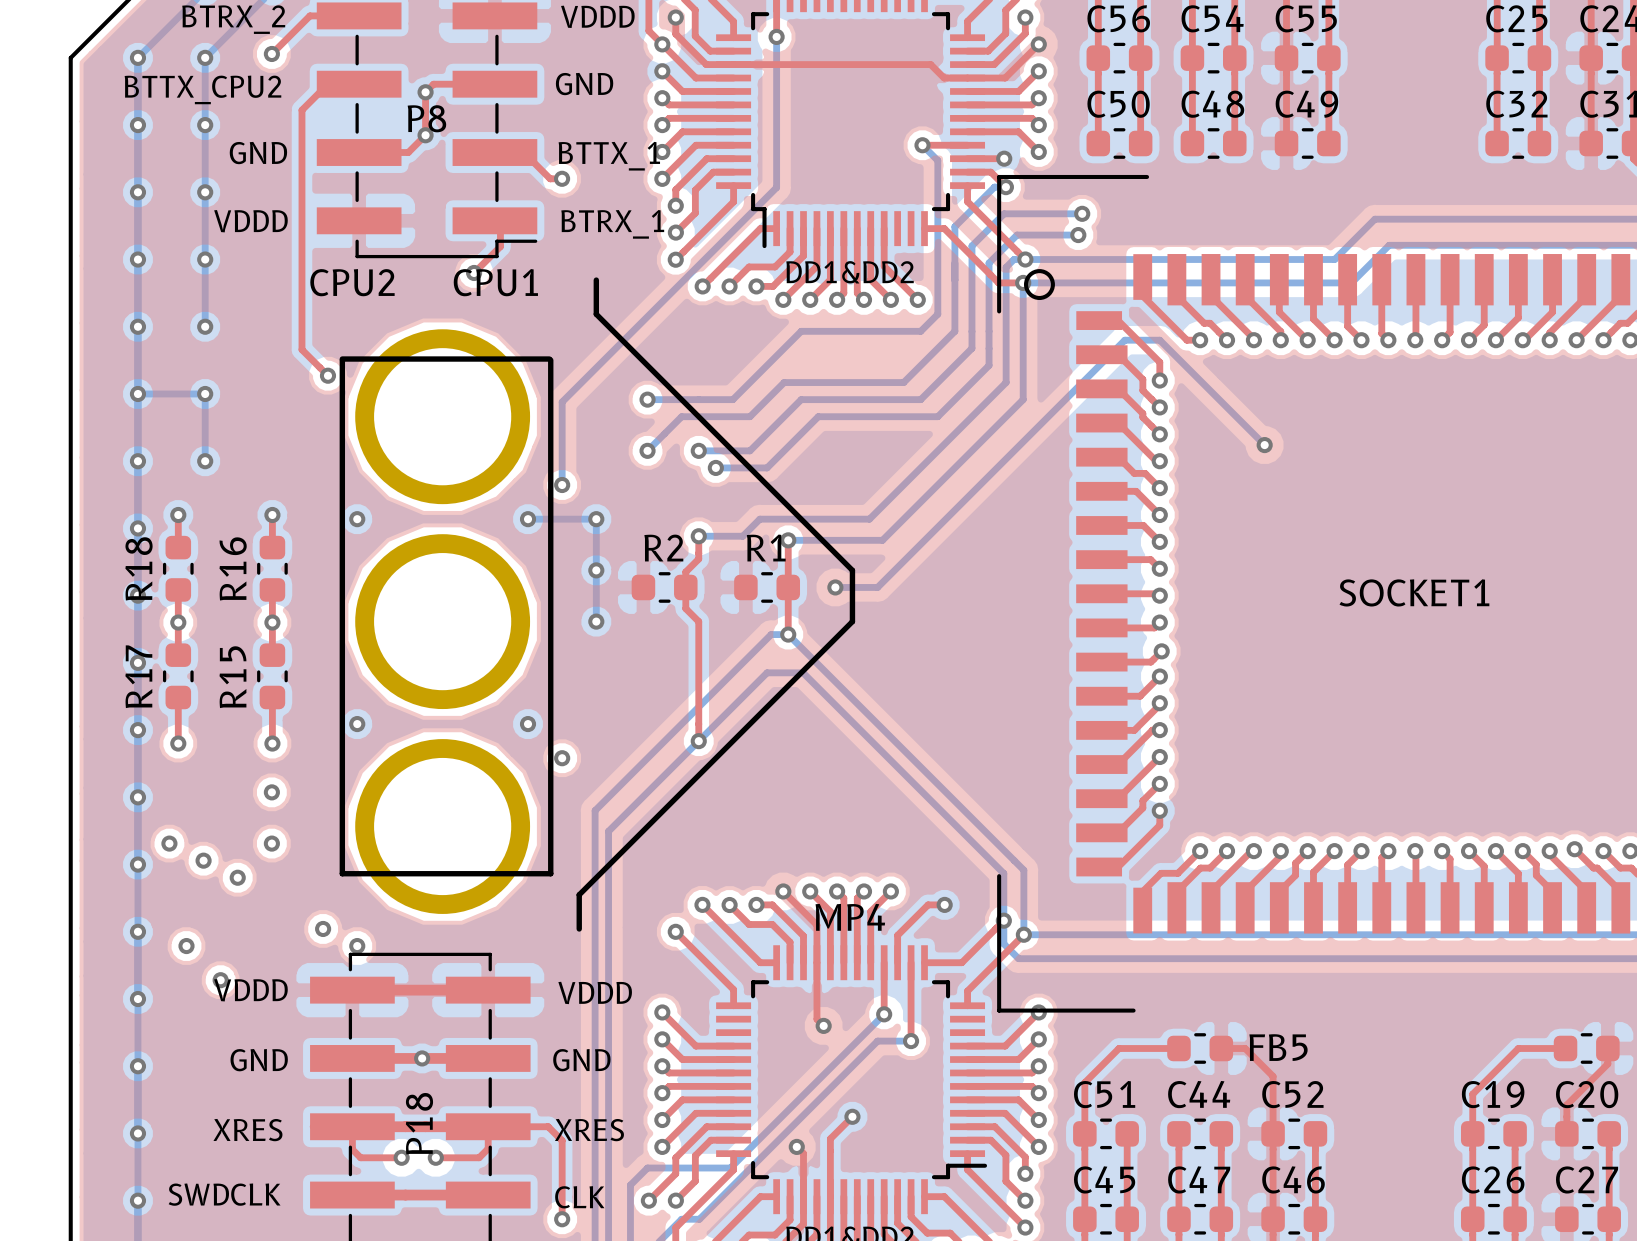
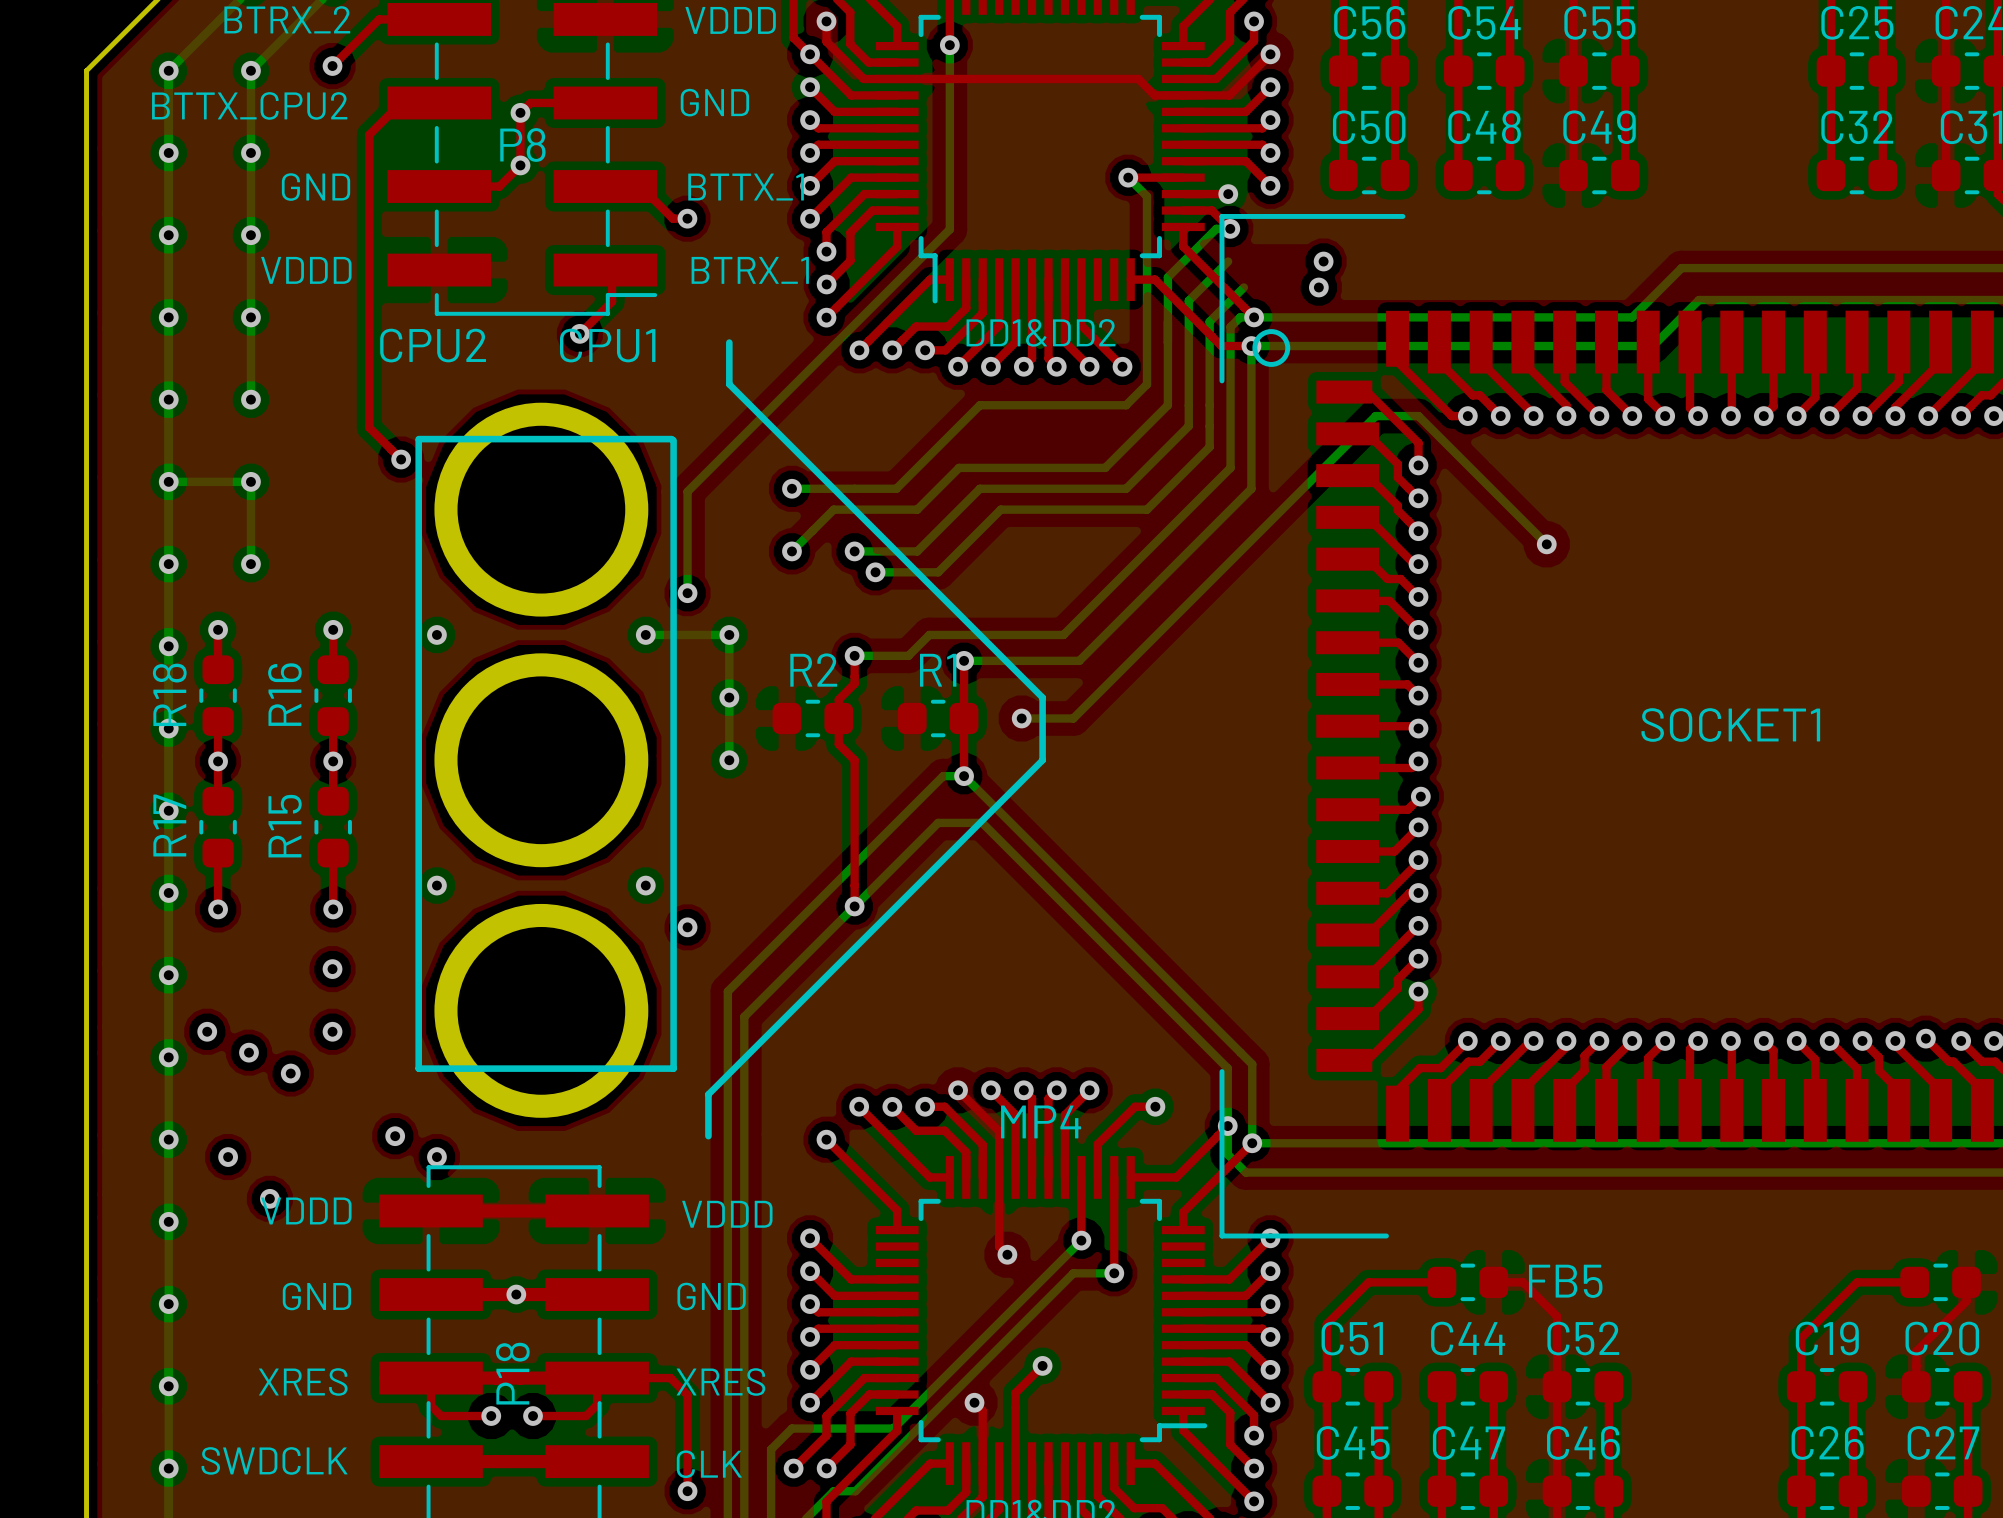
bottom track: (1004, 213) (1082, 213) -> none
bottom track: (1017, 235) (1078, 235) -> none

